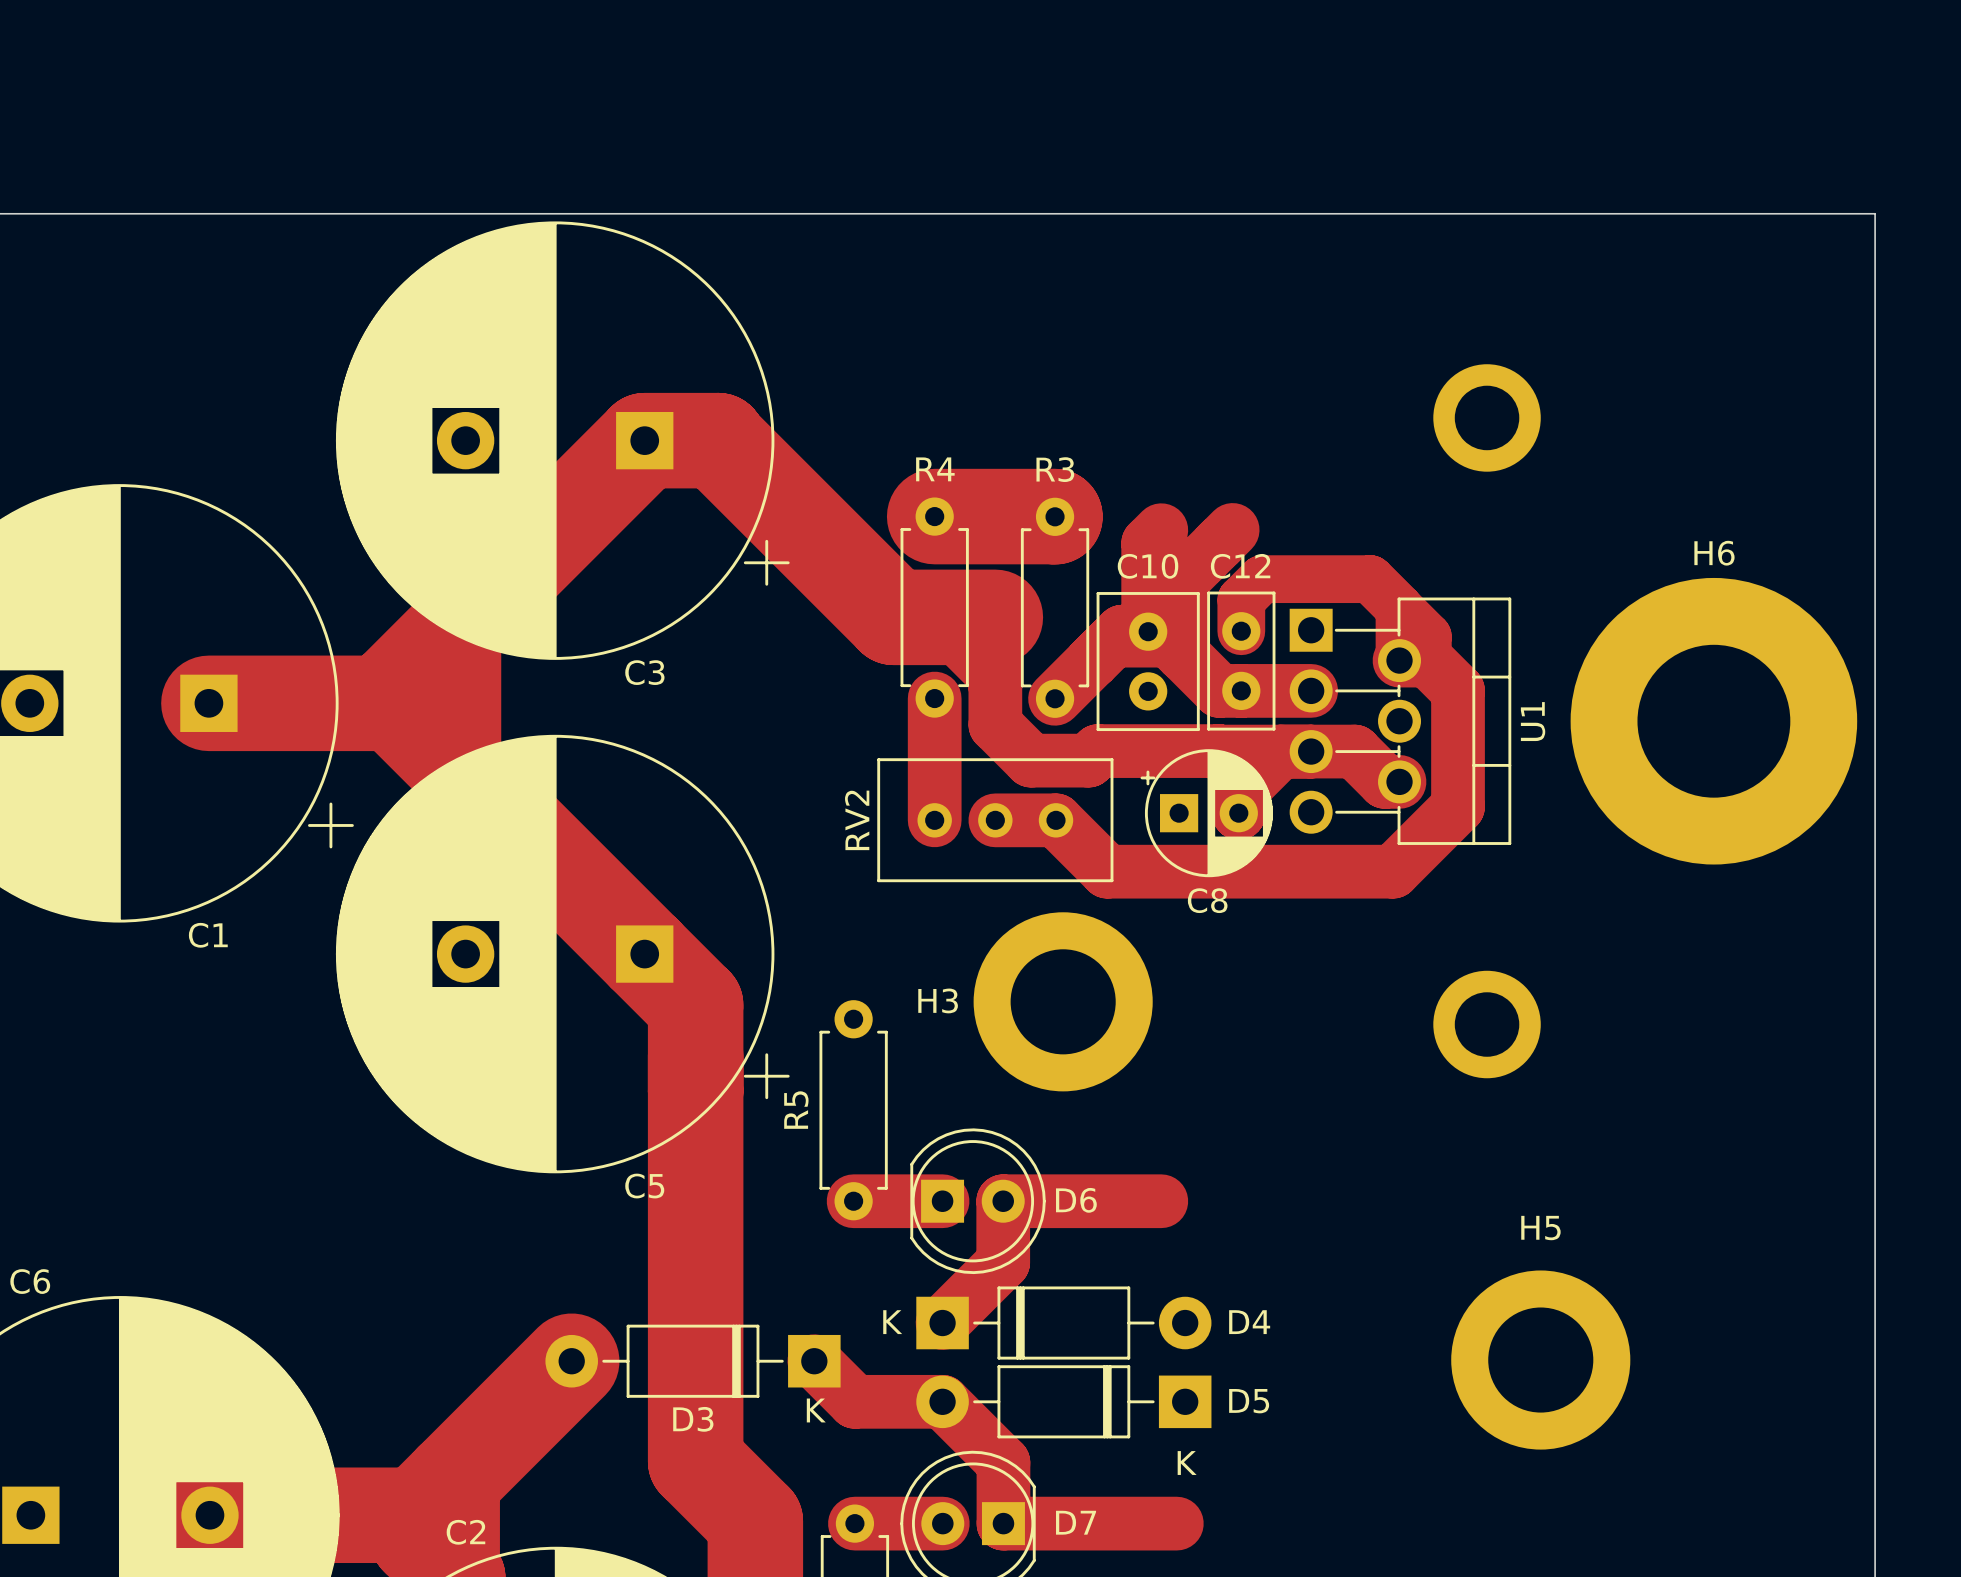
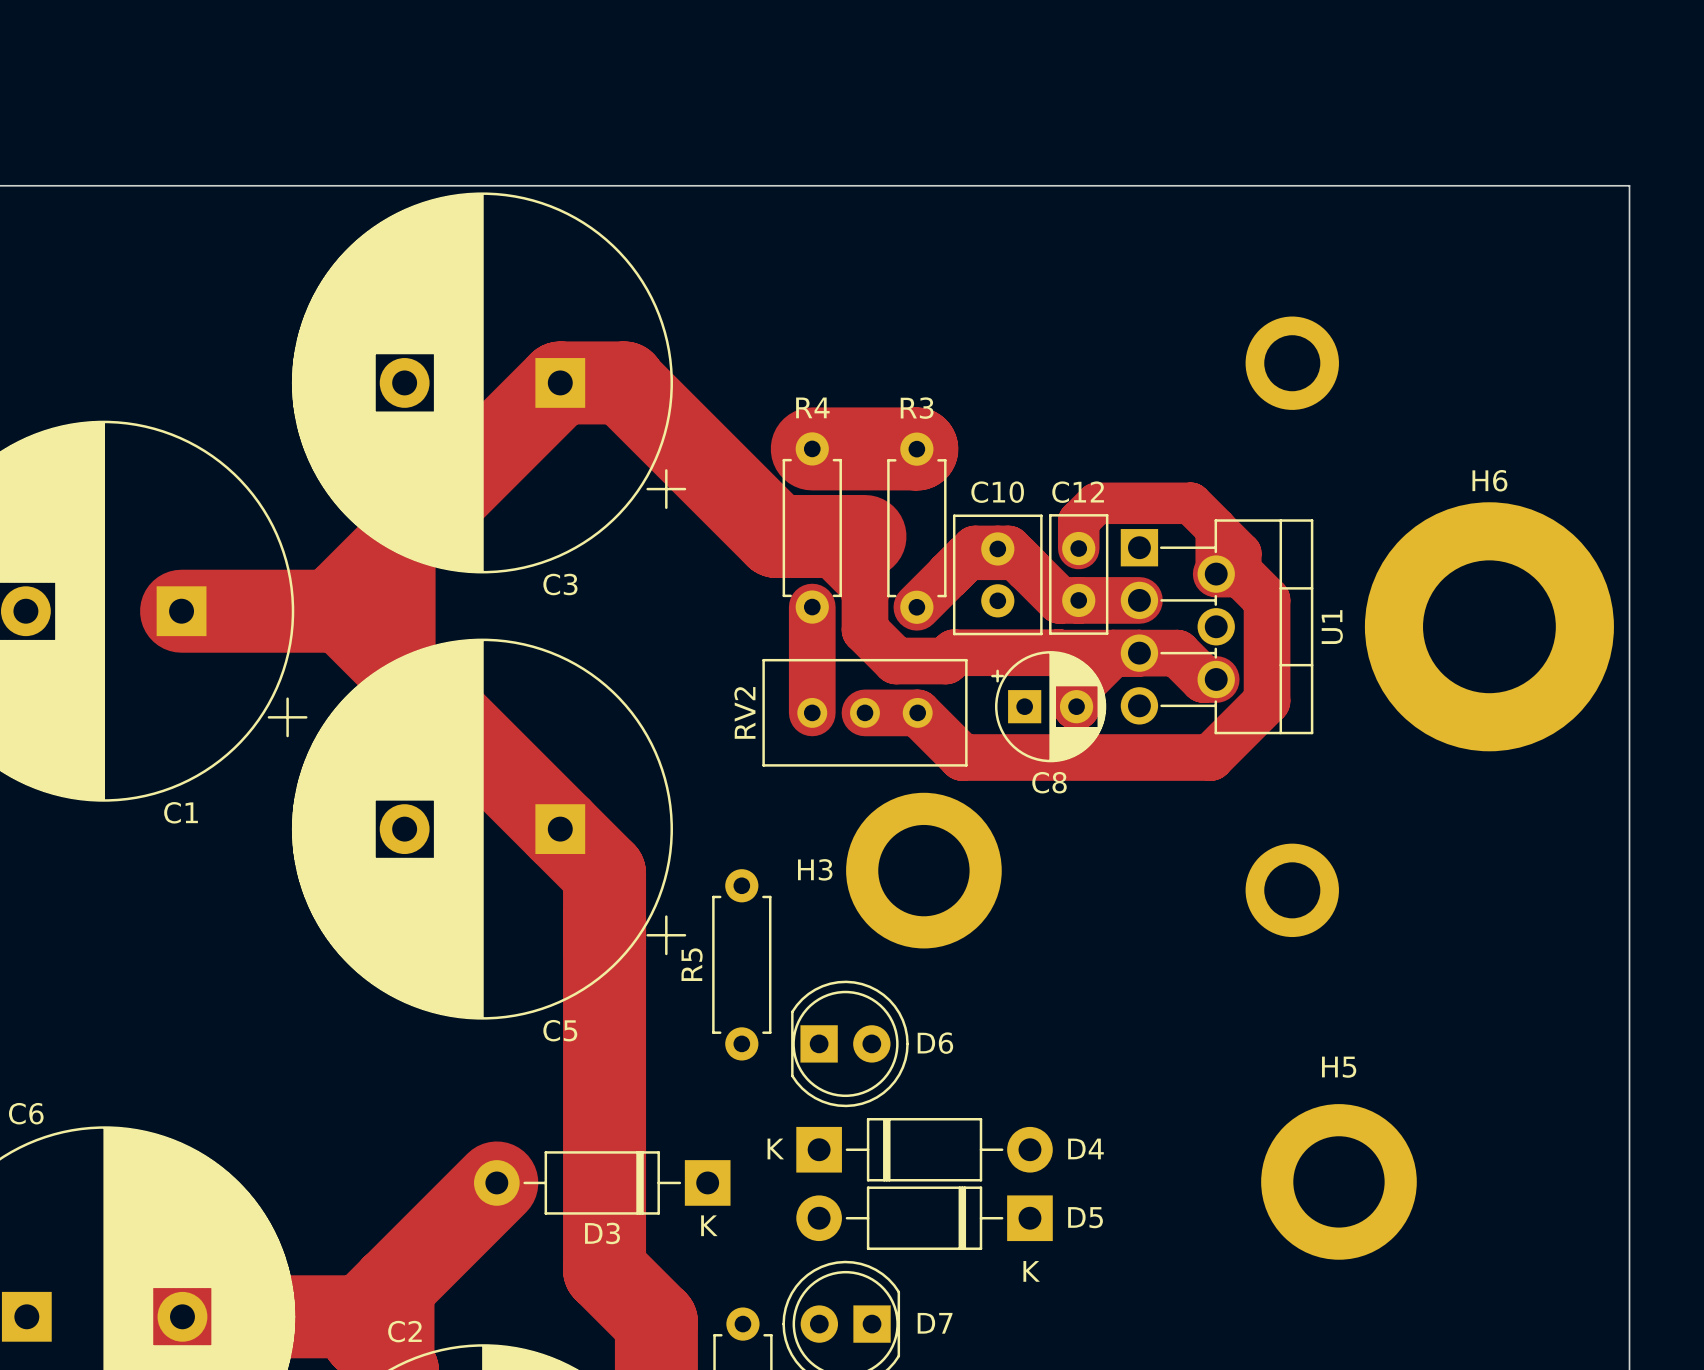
track: (1232, 529) (1182, 579) (1182, 654) -> none
track: (1161, 530) (1148, 543) (1148, 631) -> none
track: (853, 1201) (942, 1201) -> none
track: (1161, 1201) (1003, 1201) (1003, 1262) (942, 1323) -> none
track: (814, 1361) (854, 1401) (942, 1401) (1003, 1462) (1003, 1523) (1176, 1523) -> none
track: (854, 1523) (942, 1523) -> none

